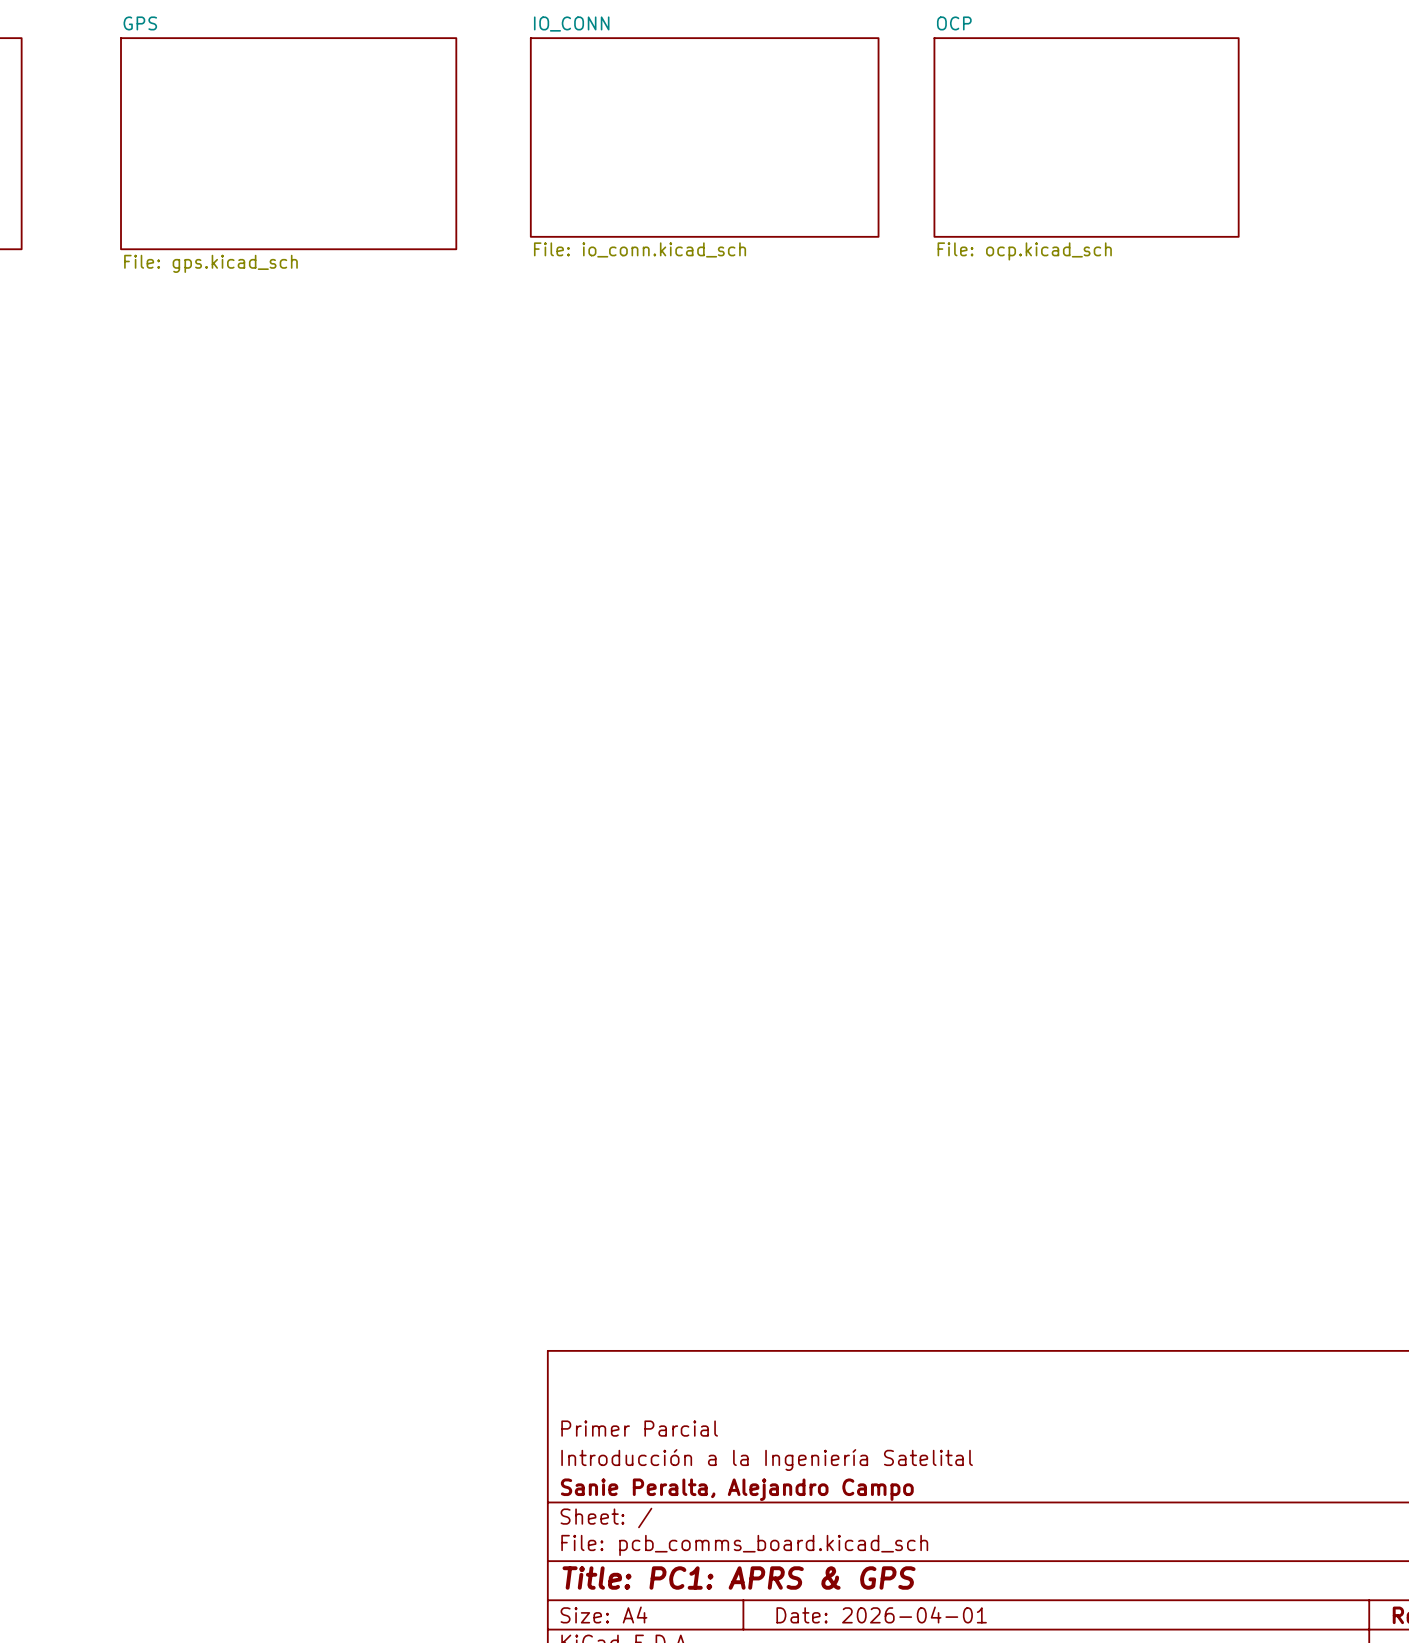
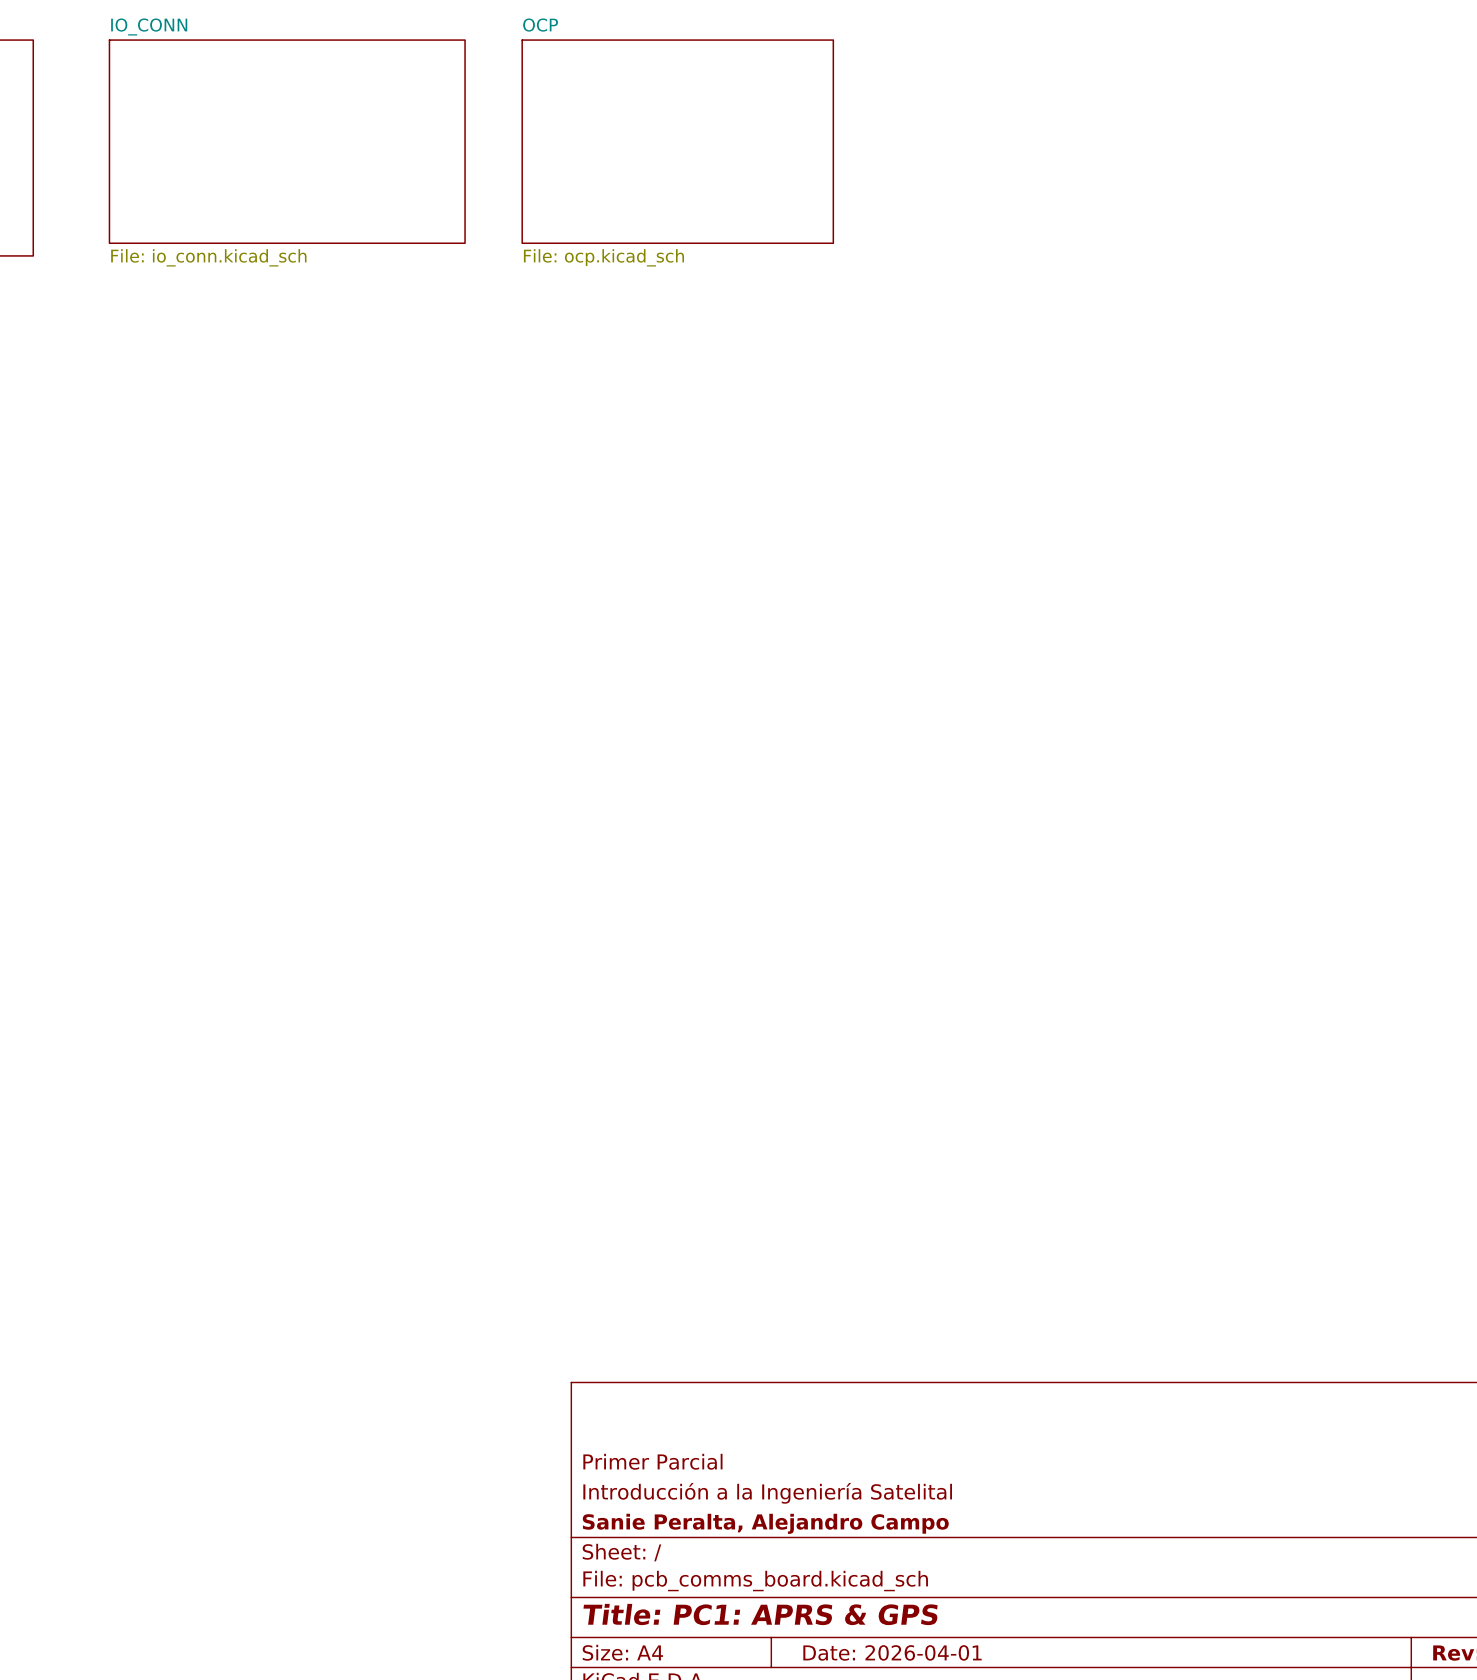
sheet IO_CONN: none -> File: io_conn.kicad_sch (287, 141)
sheet OCP: none -> File: ocp.kicad_sch (677, 141)
sheet IO_CONN: File: io_conn.kicad_sch (704, 137) -> none
sheet OCP: File: ocp.kicad_sch (1086, 137) -> none
sheet GPS: File: gps.kicad_sch (288, 143) -> none

